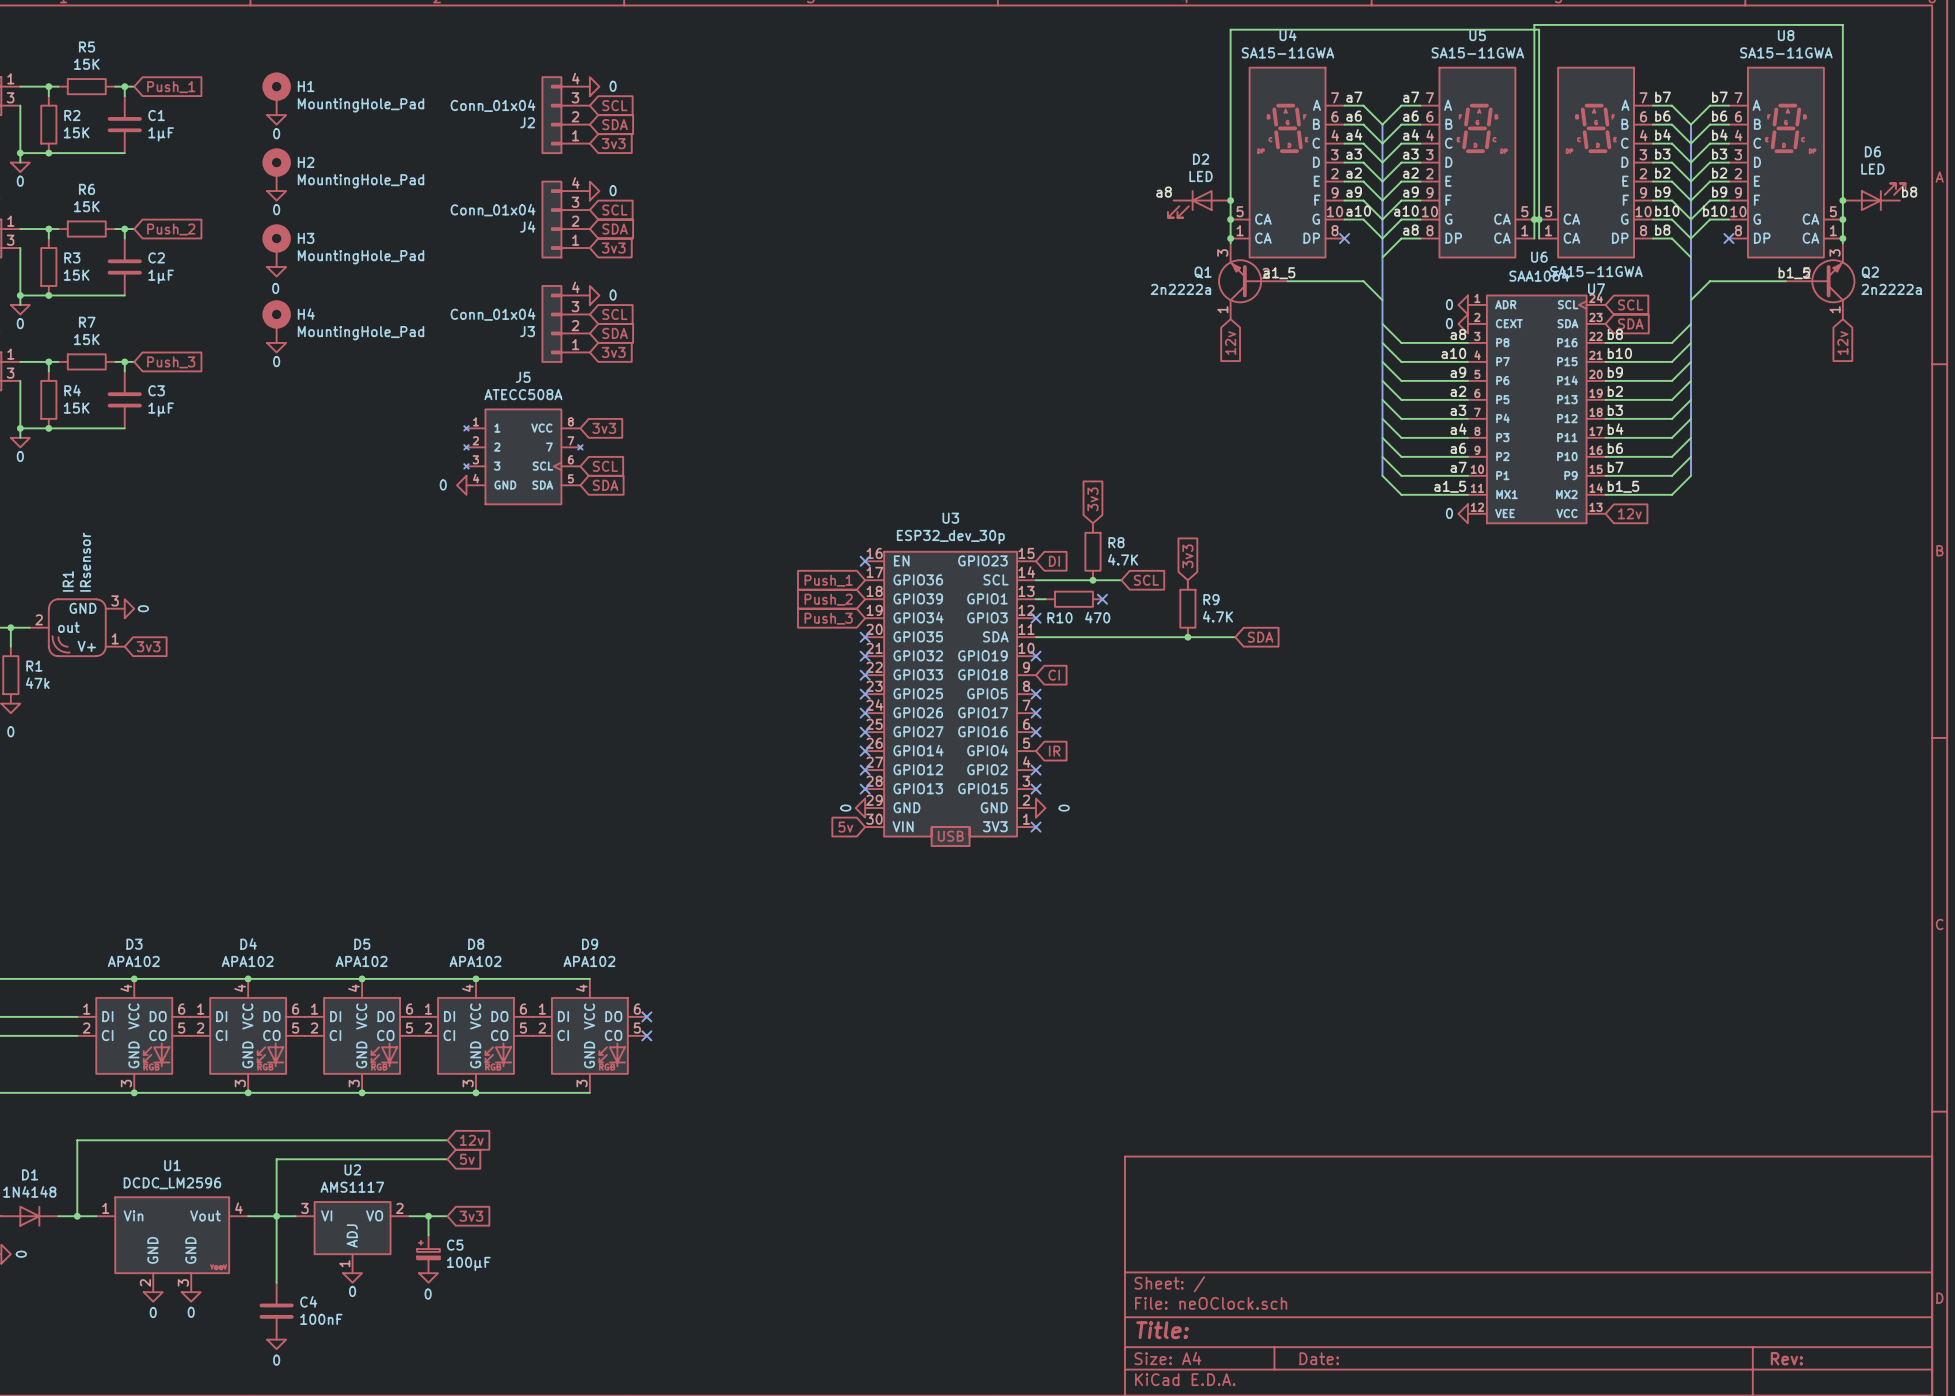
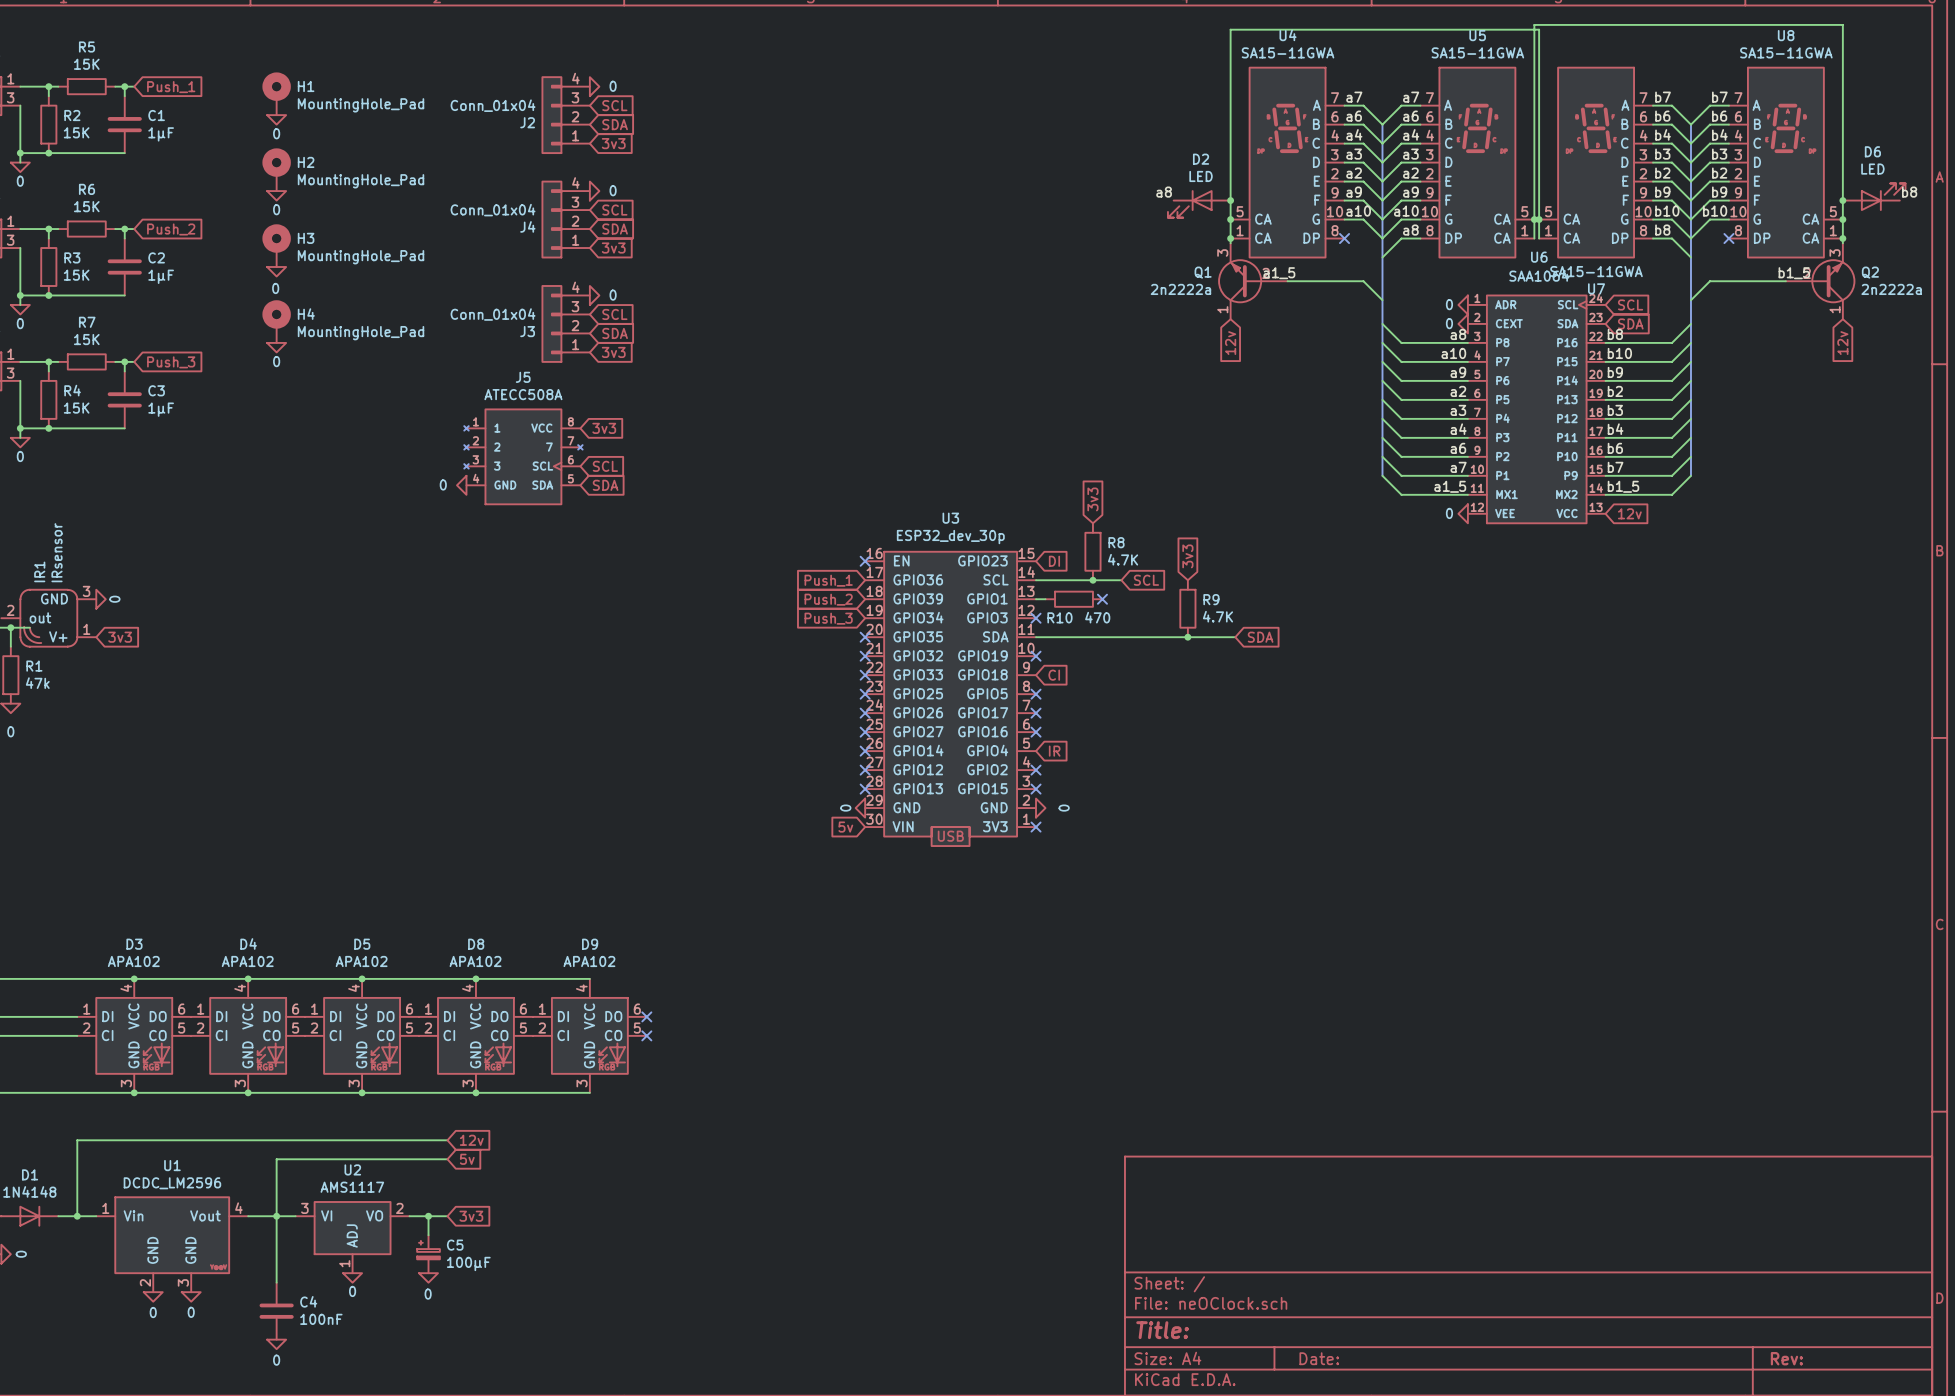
power symbol position: 0 (129, 608) -> 0 (101, 599)
IR1 position: (77, 627) -> (48, 618)
global label position: 3v3 (148, 646) -> 3v3 (120, 637)

